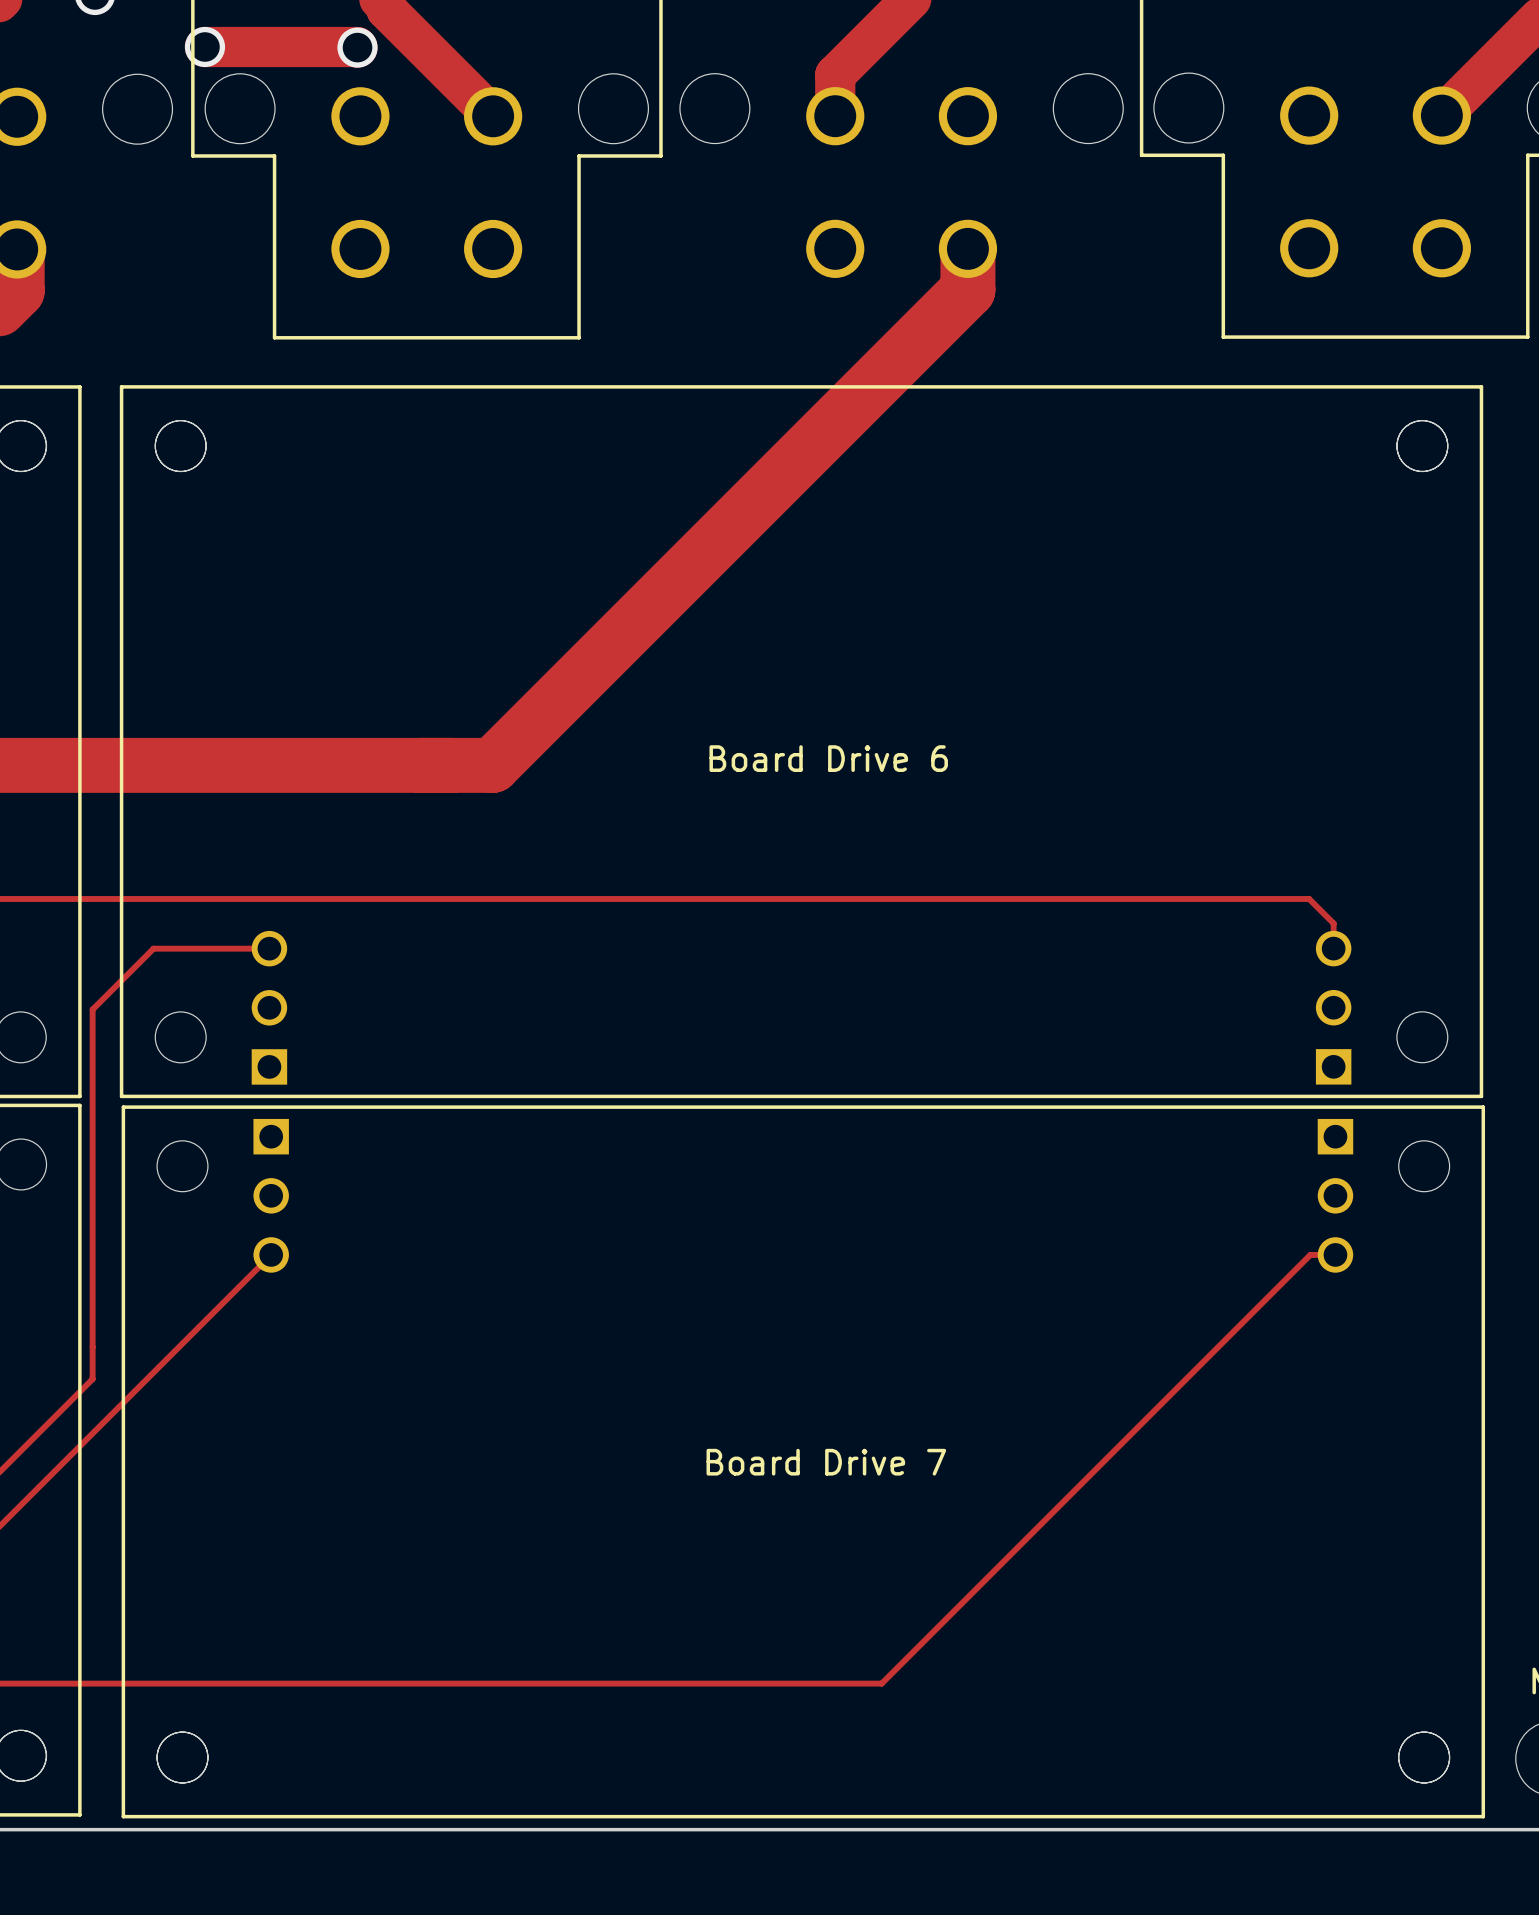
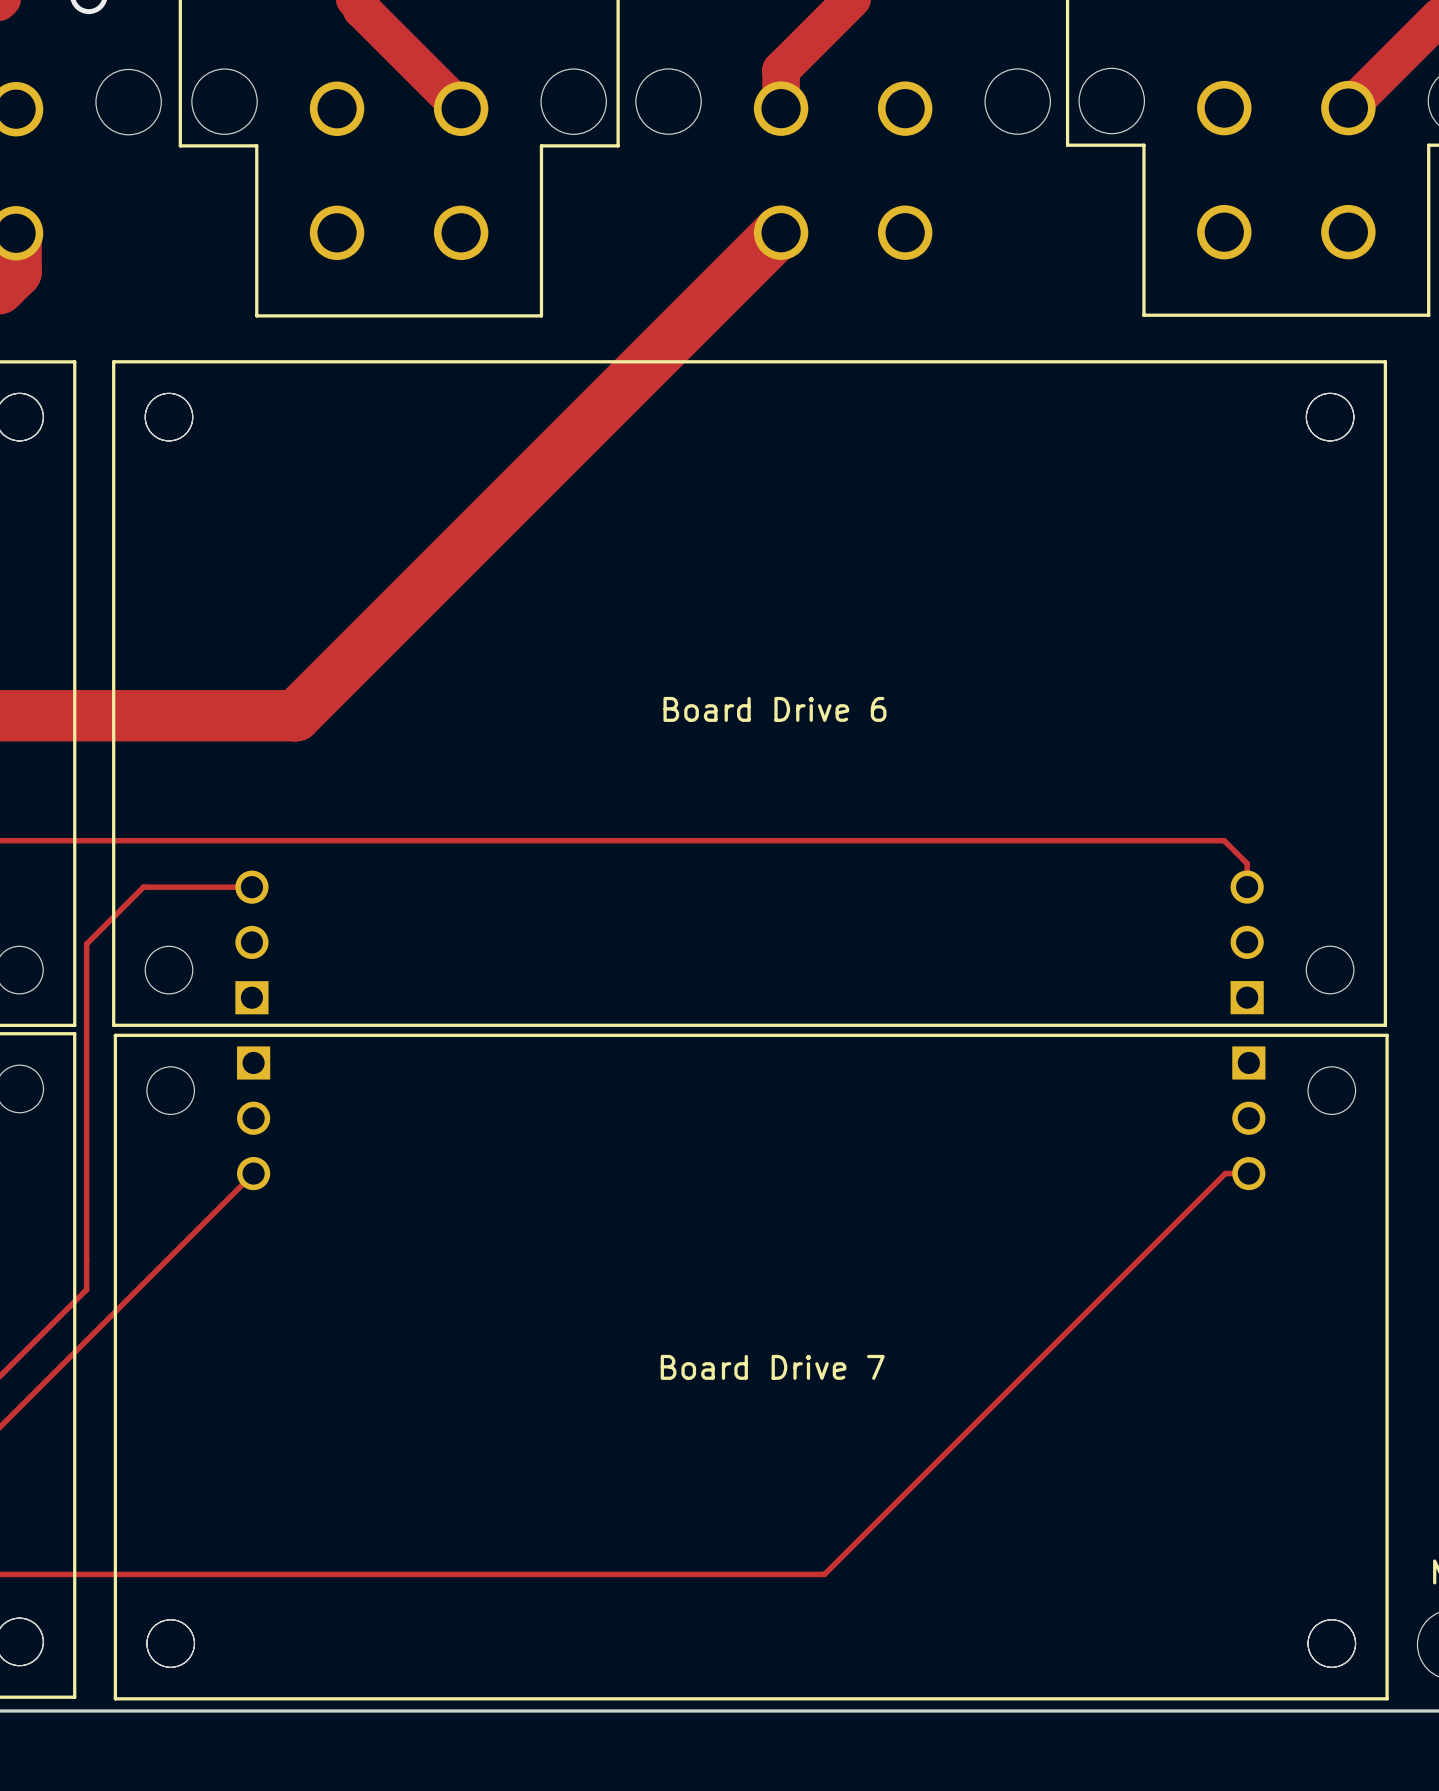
track: (204, 47) (357, 47) -> none
via: (204, 47) -> none
via: (357, 47) -> none
track: (967, 248) (967, 290) (492, 765) (316, 765) -> (779, 231) (295, 715)

